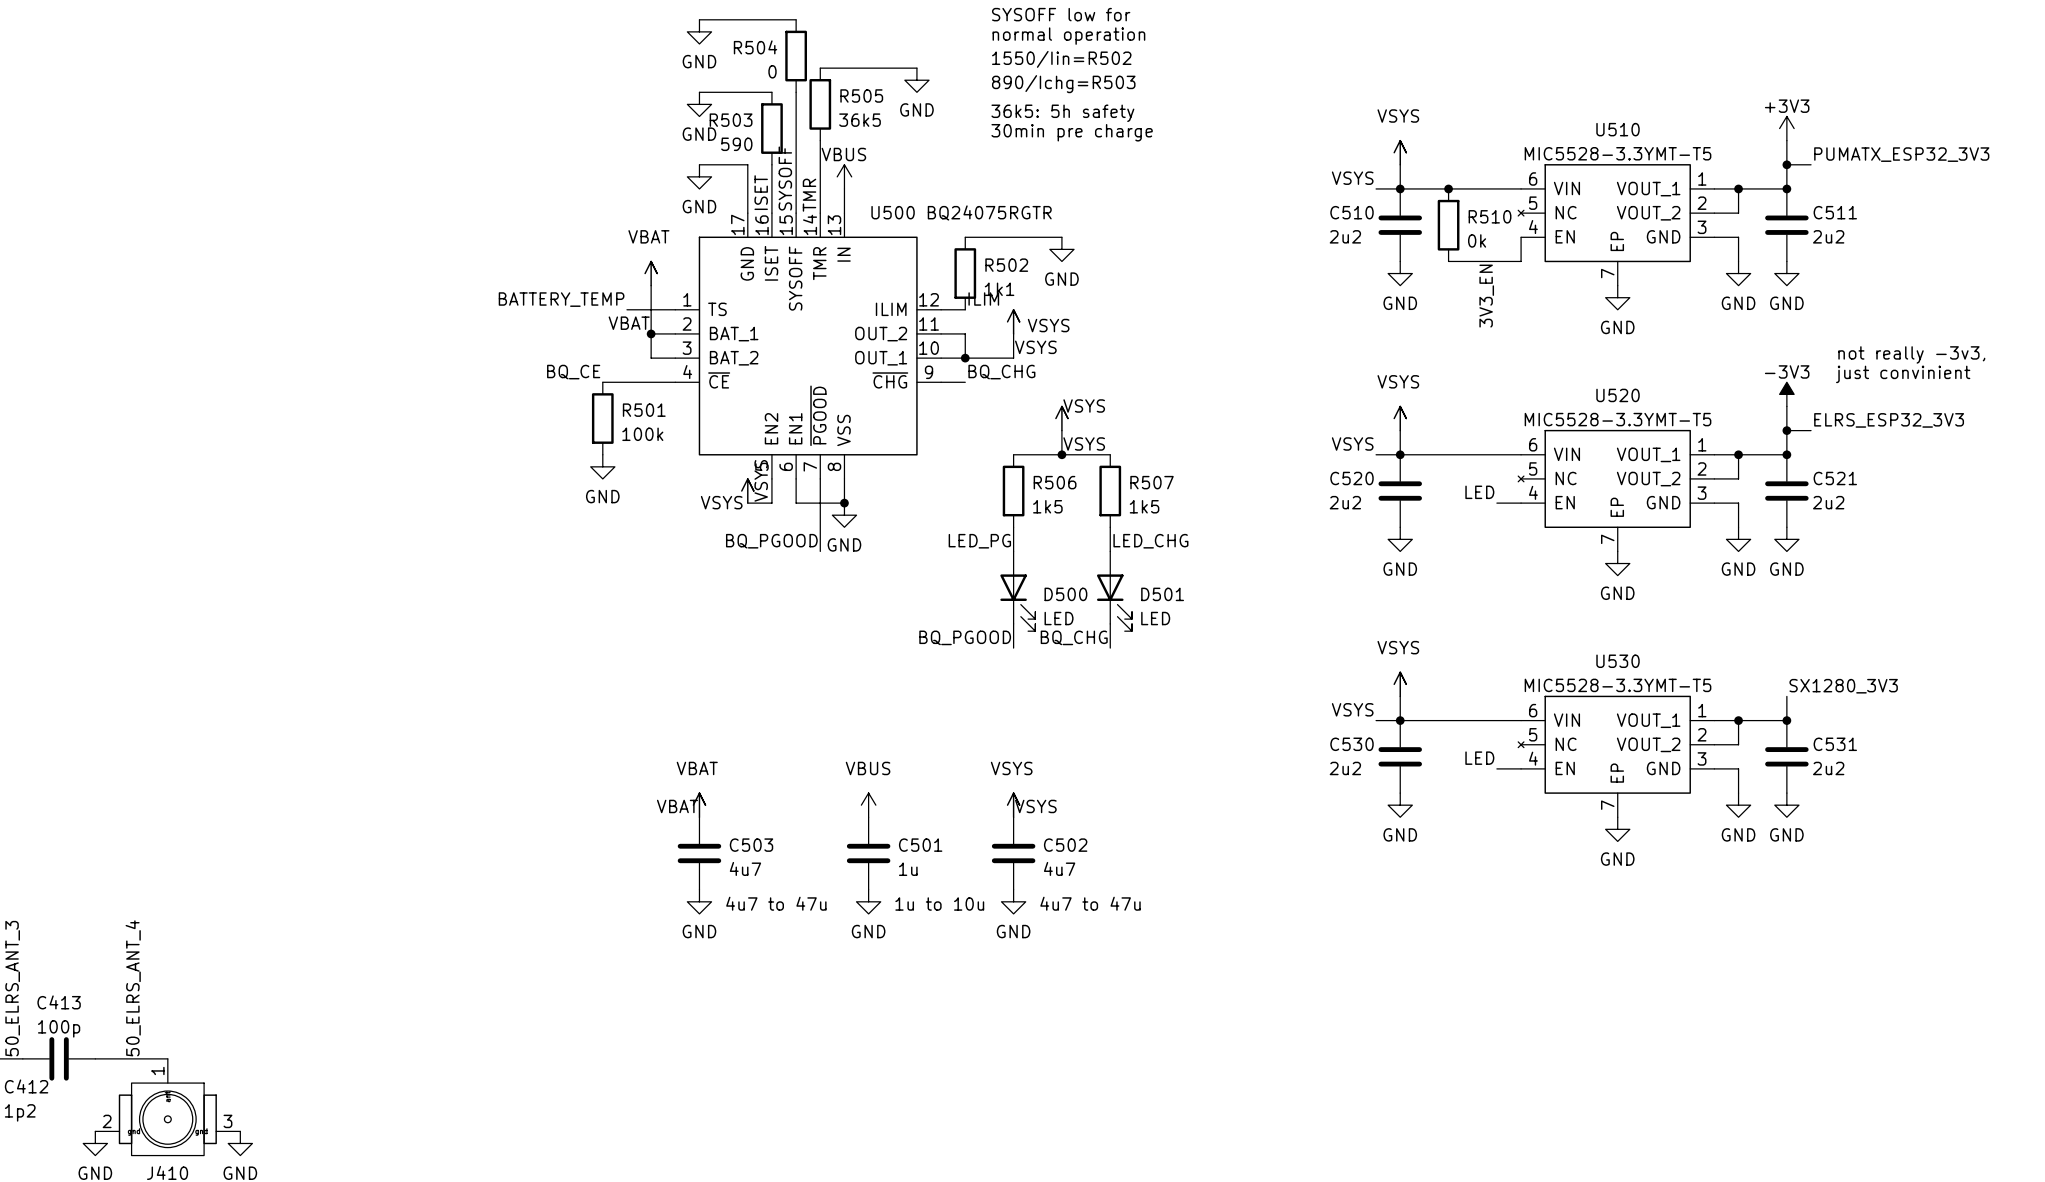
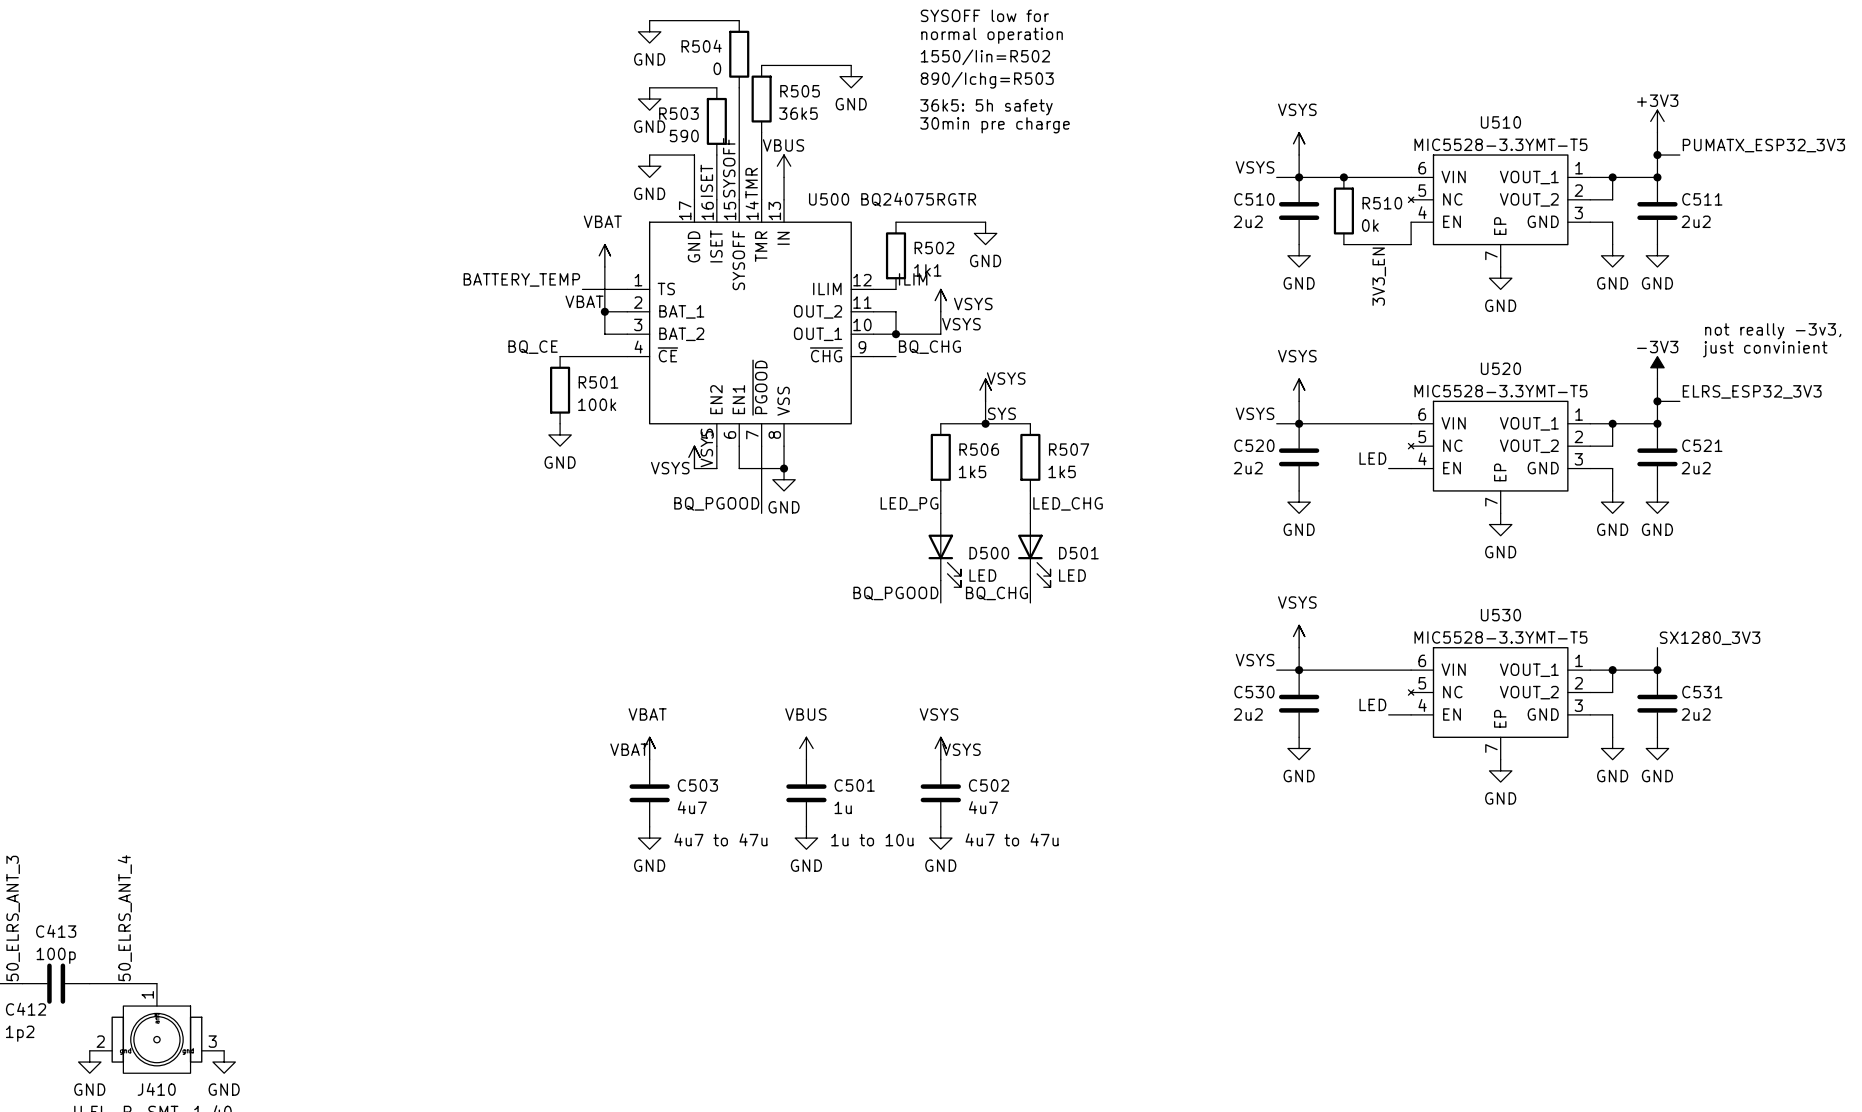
label: VSYS (1084, 443) -> SYS (1001, 413)

